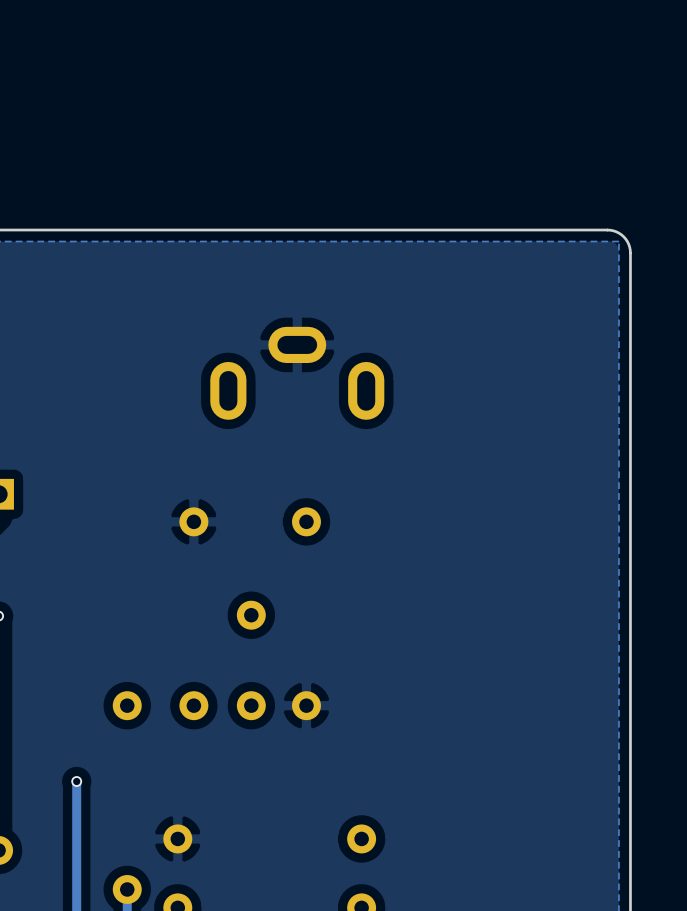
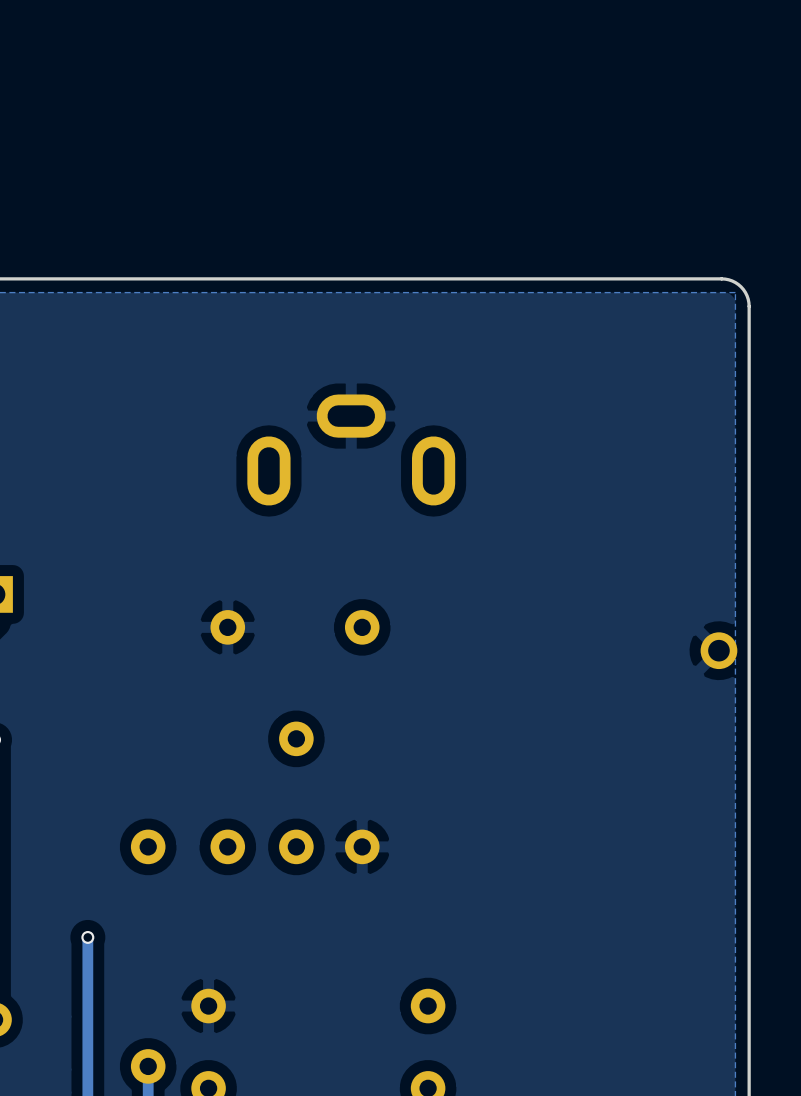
part: none -> (718, 650)

